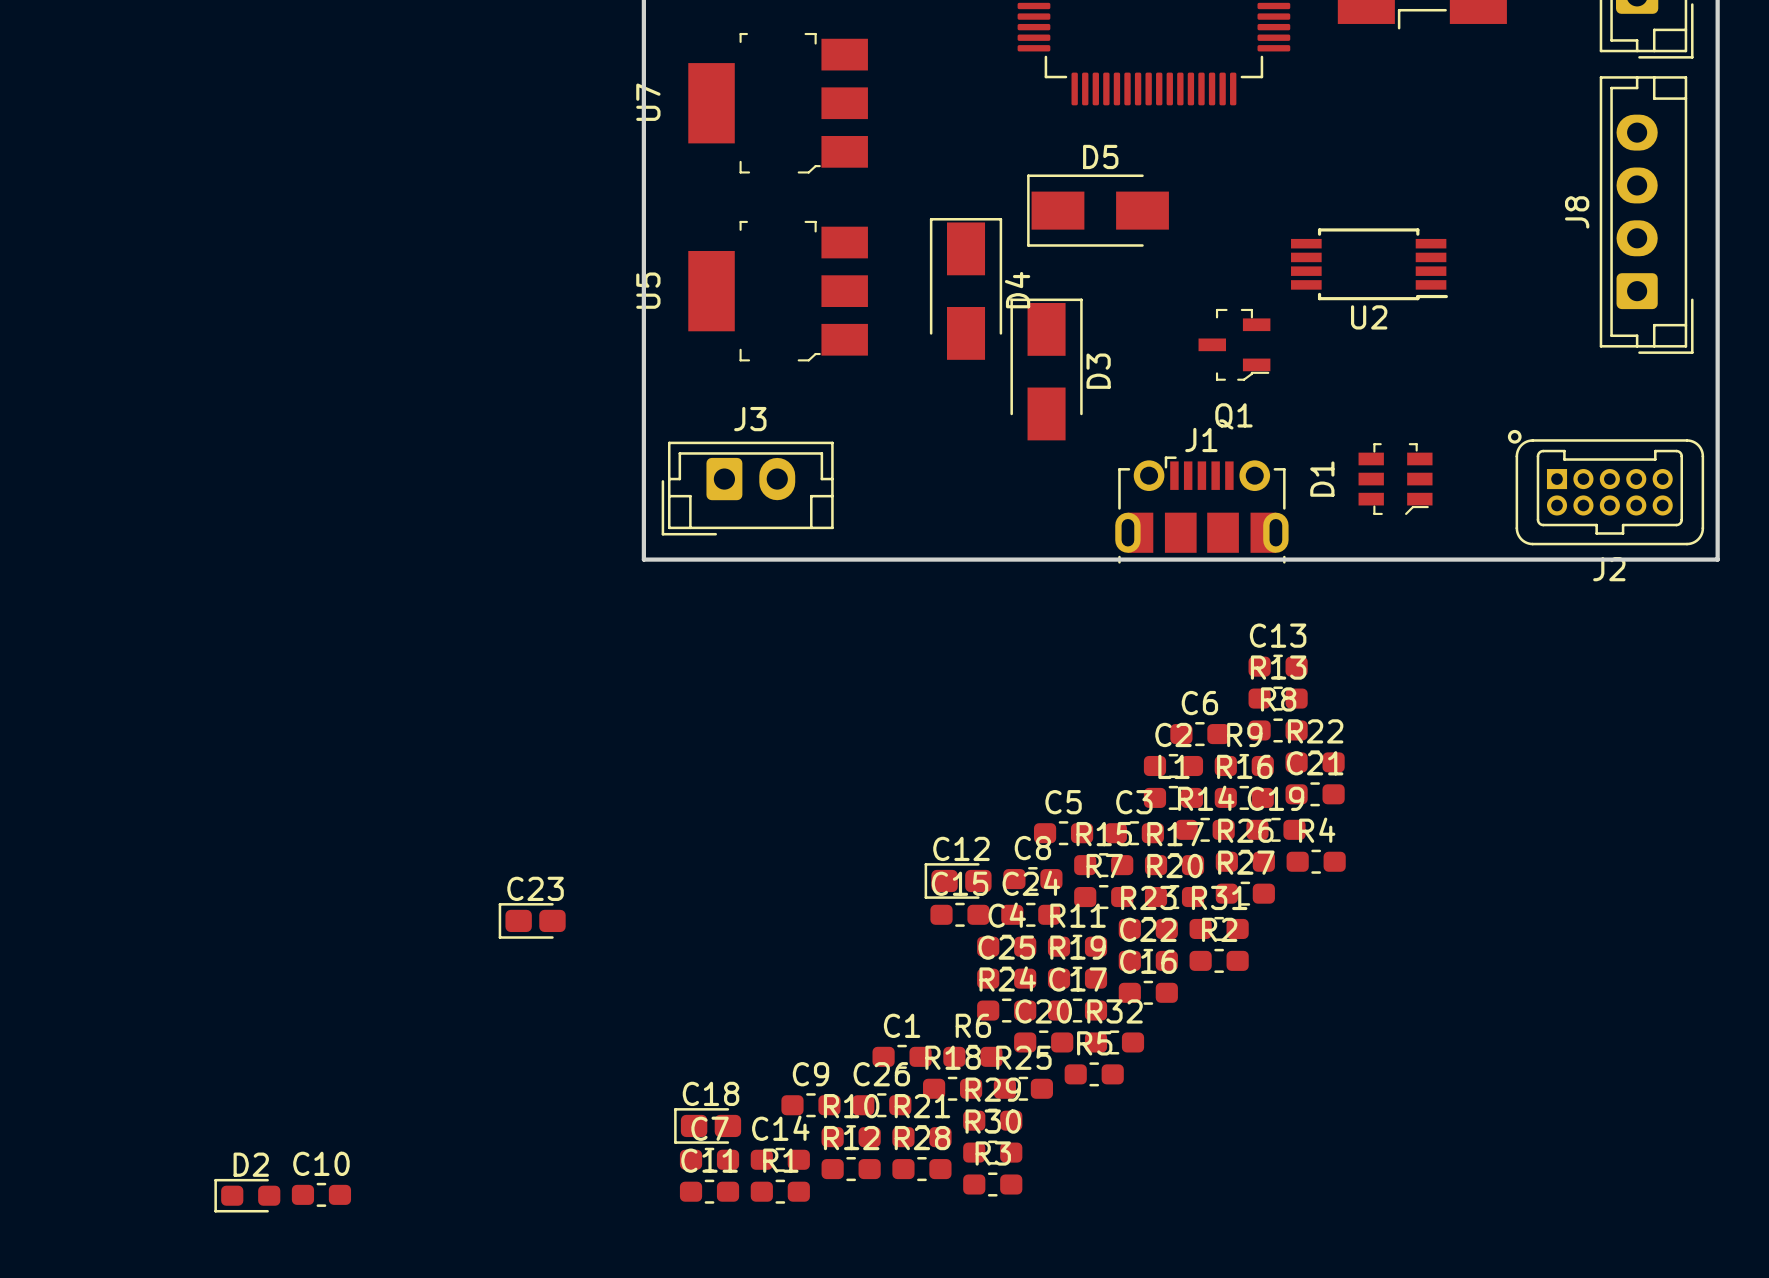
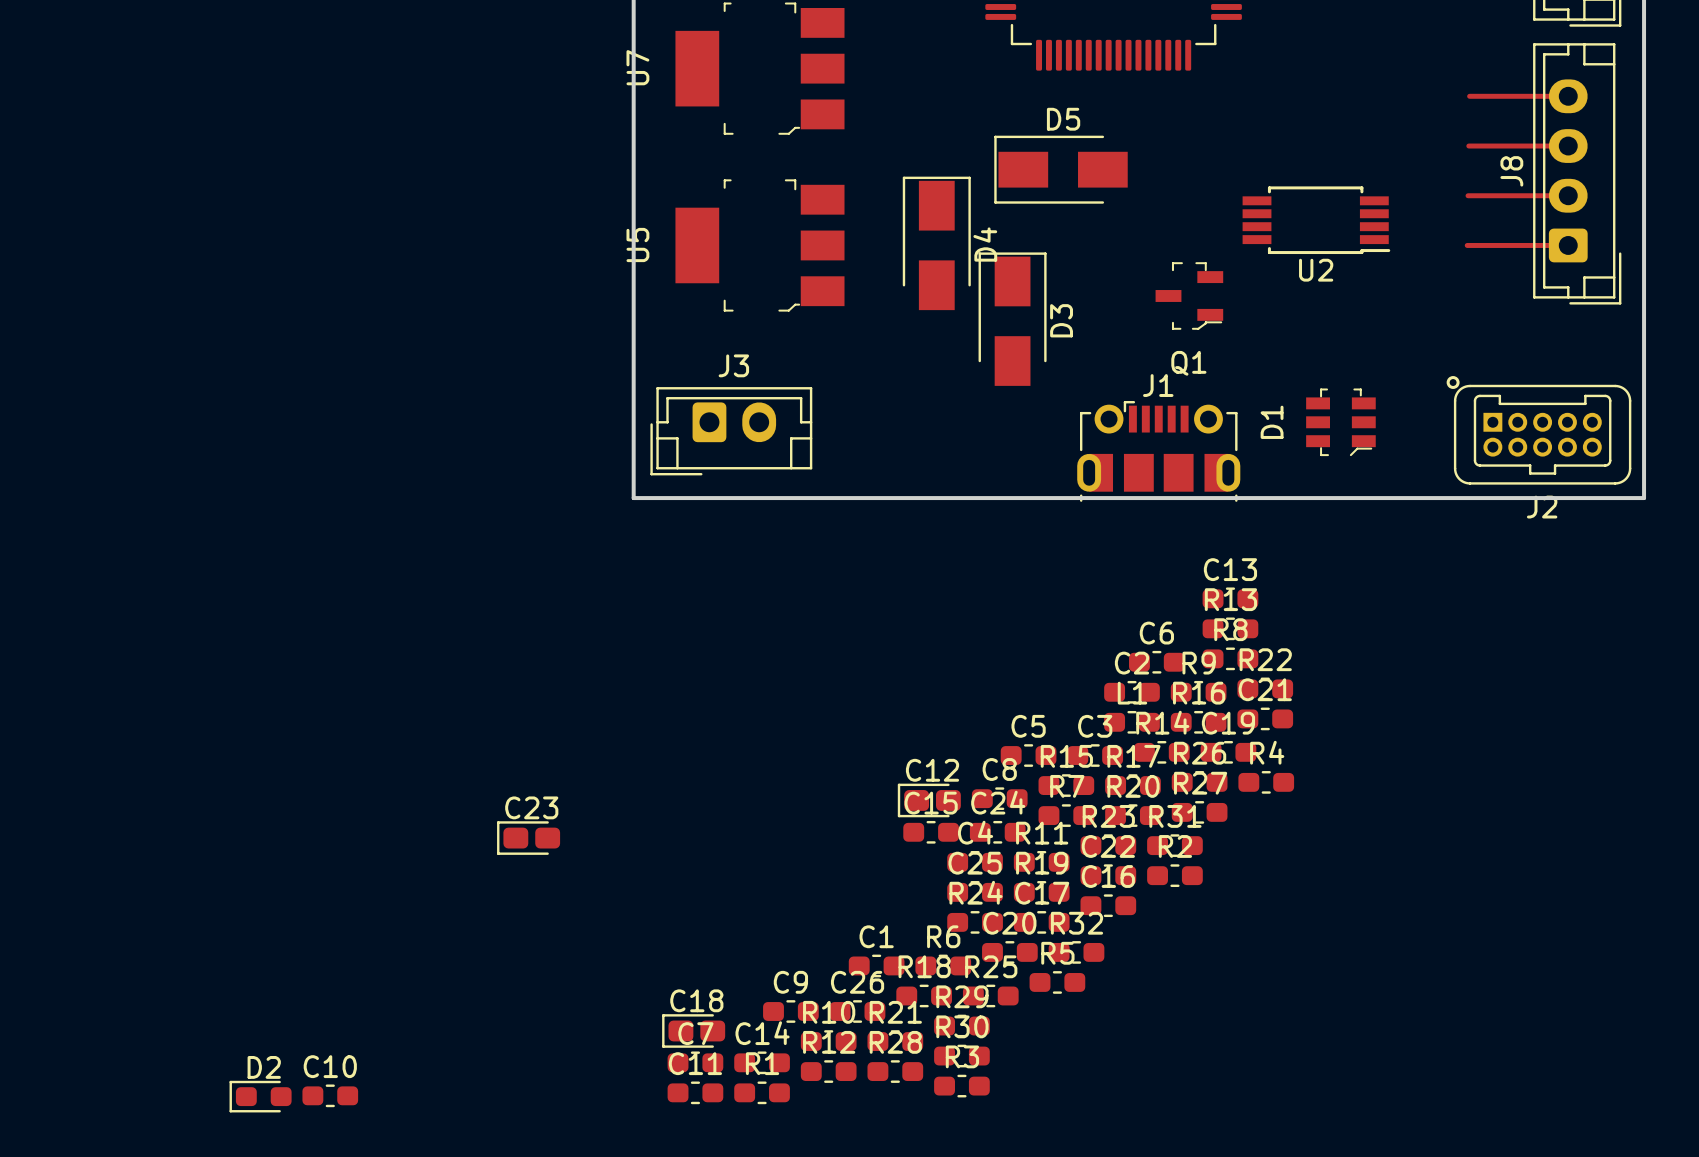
track: none -> (1469, 96) (1568, 96)
track: none -> (1468, 146) (1568, 146)
track: none -> (1468, 195) (1568, 195)
track: none -> (1467, 245) (1568, 245)

